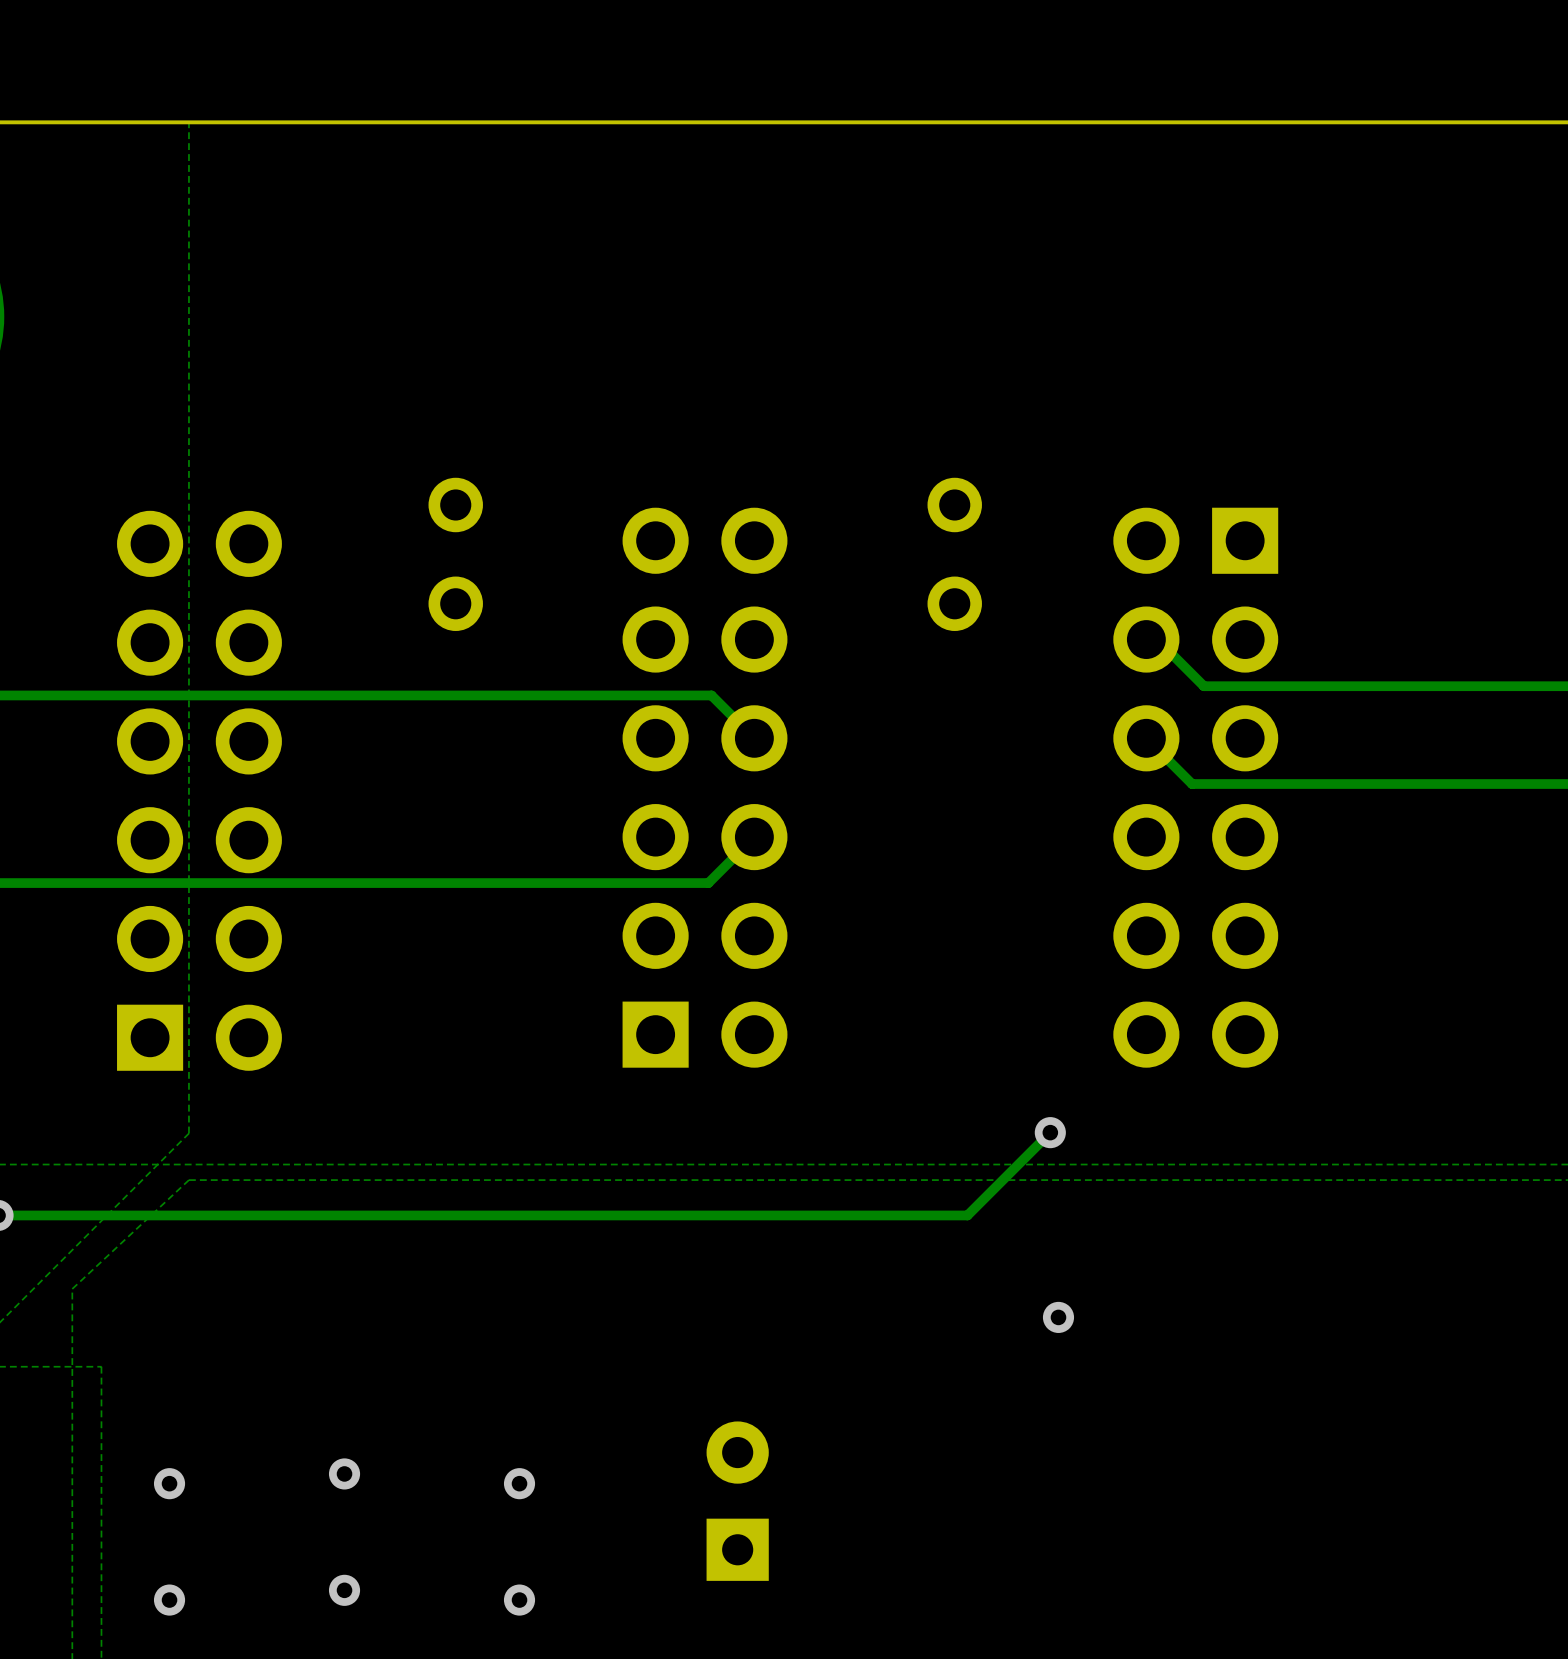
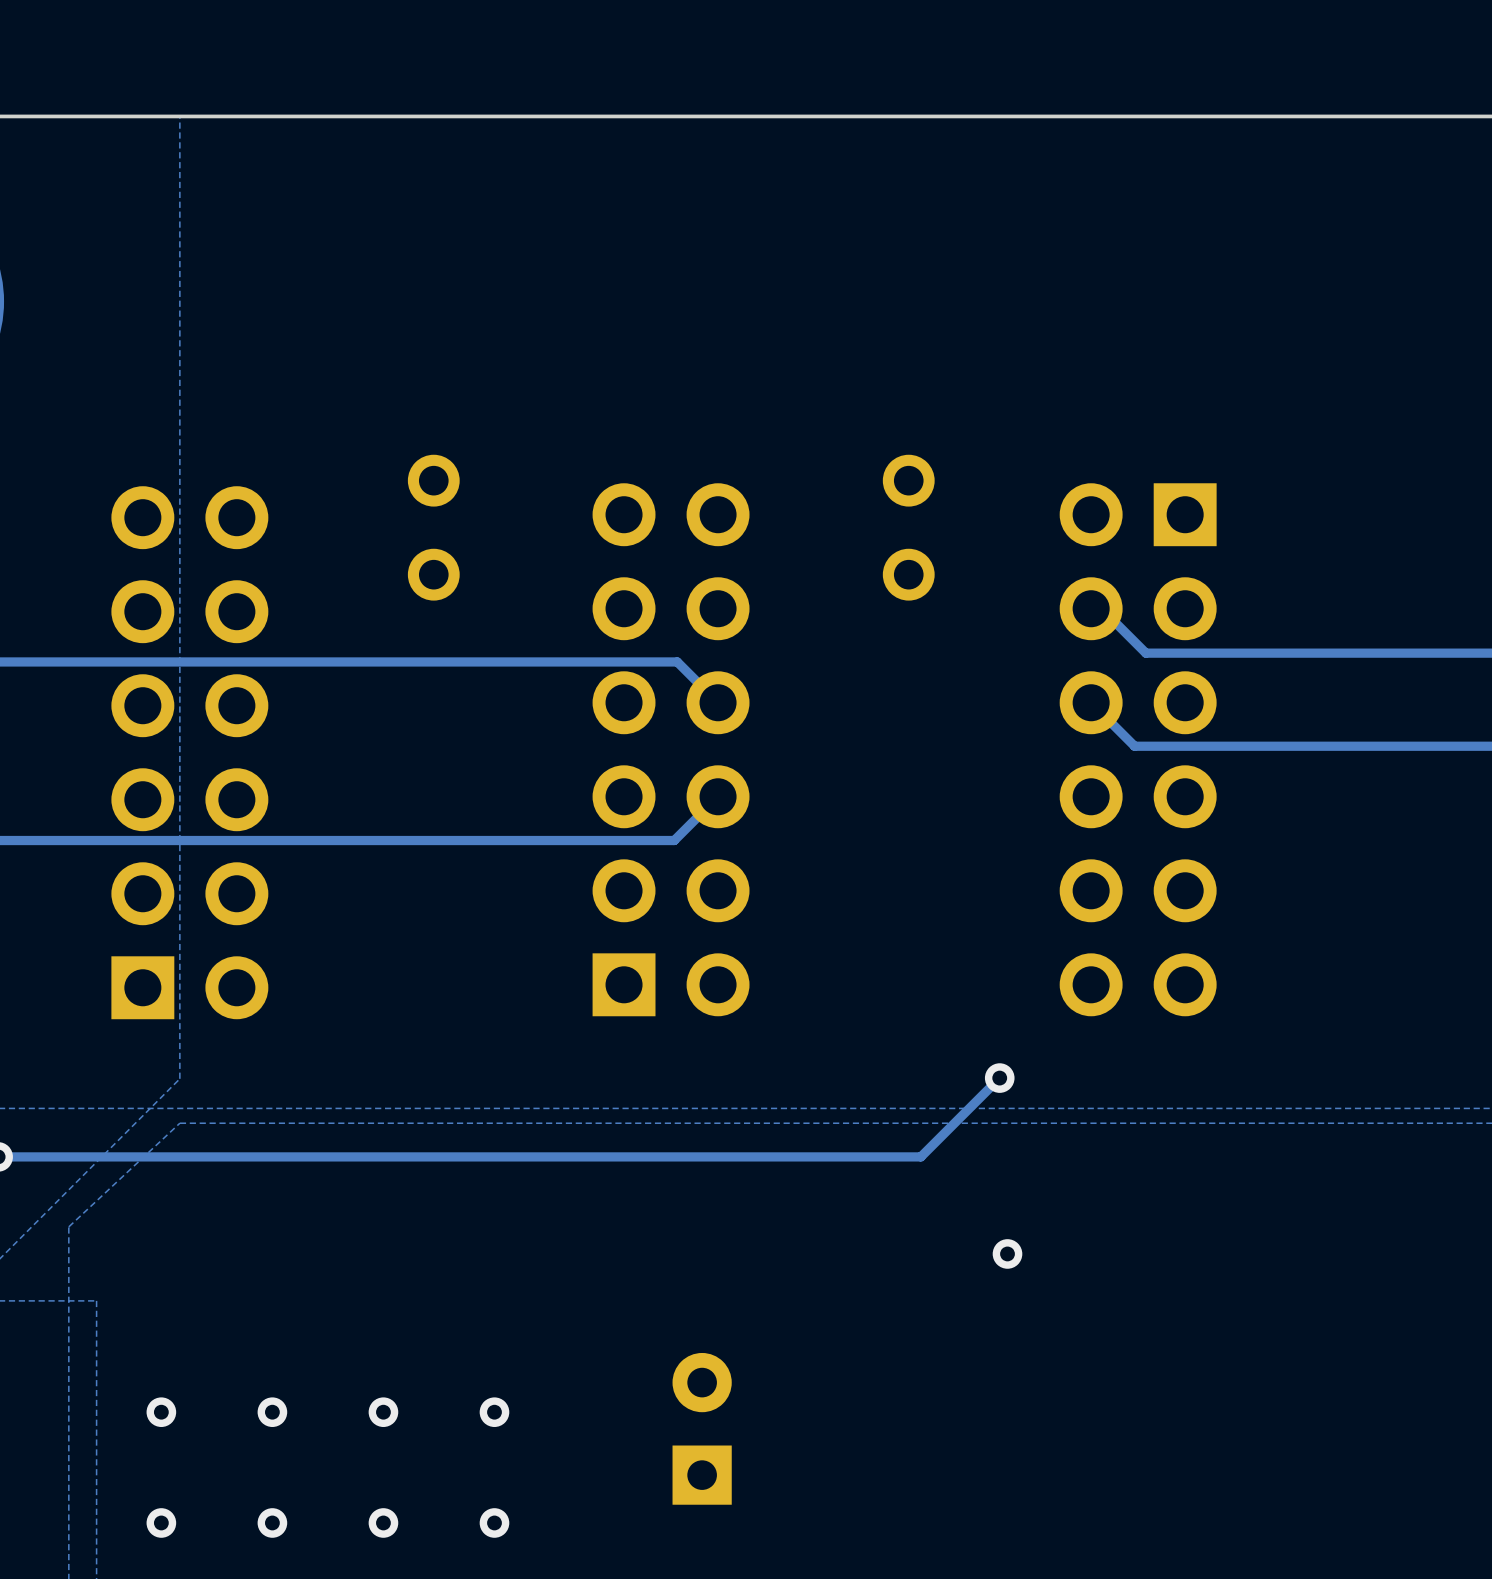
via: (344, 1473) -> none
via: none -> (272, 1412)
via: none -> (383, 1412)
via: (344, 1590) -> none
via: none -> (272, 1522)
via: none -> (383, 1522)

